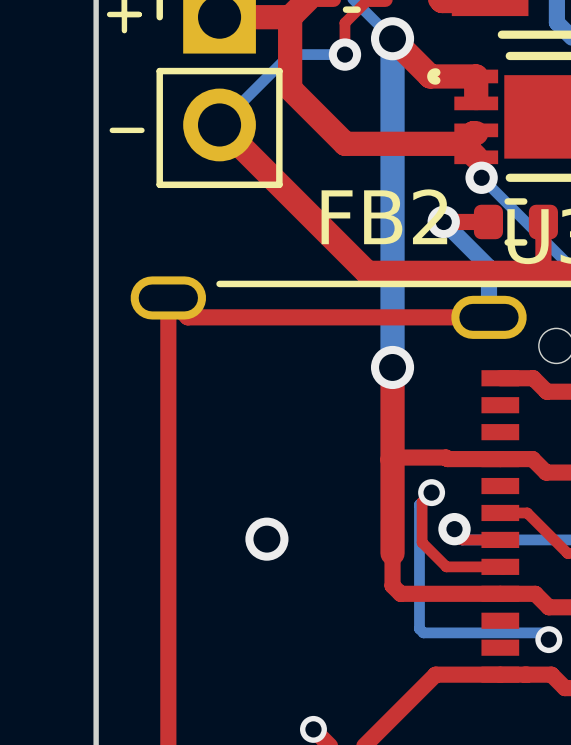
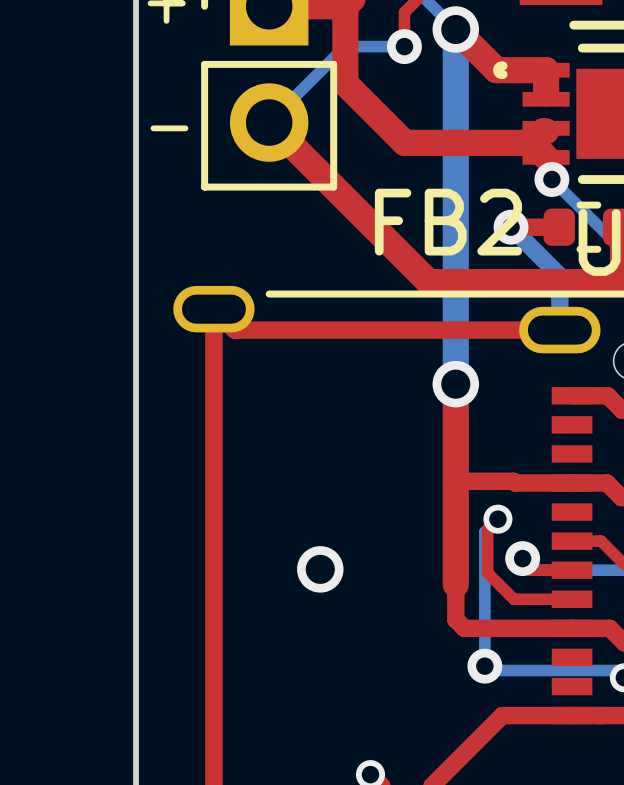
via: none -> (484, 666)

